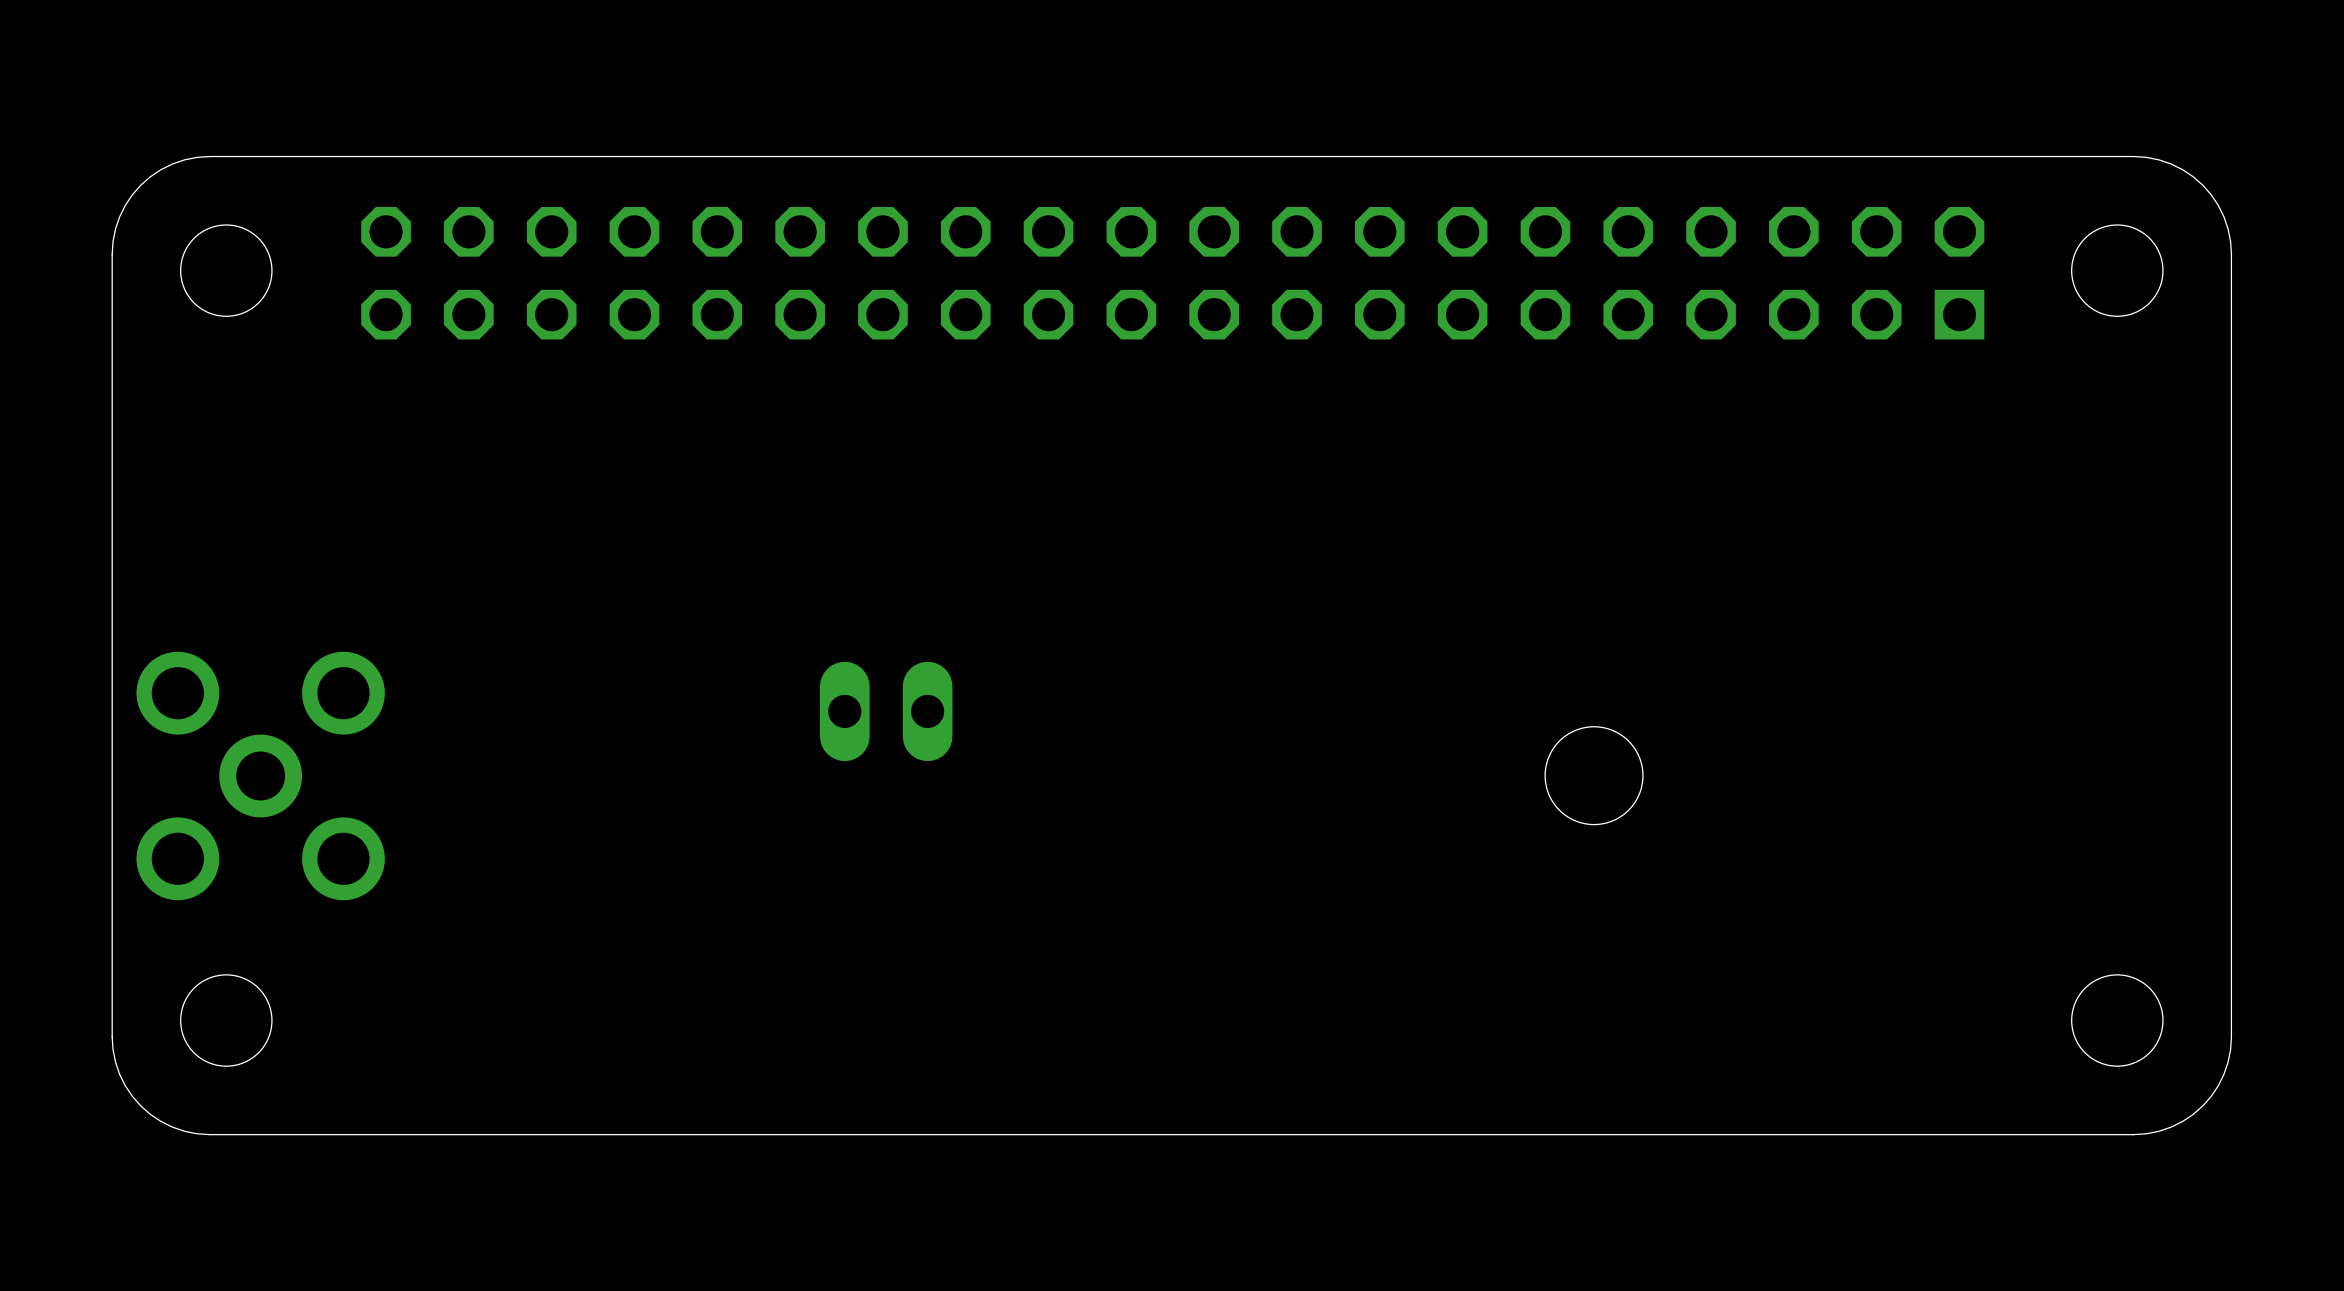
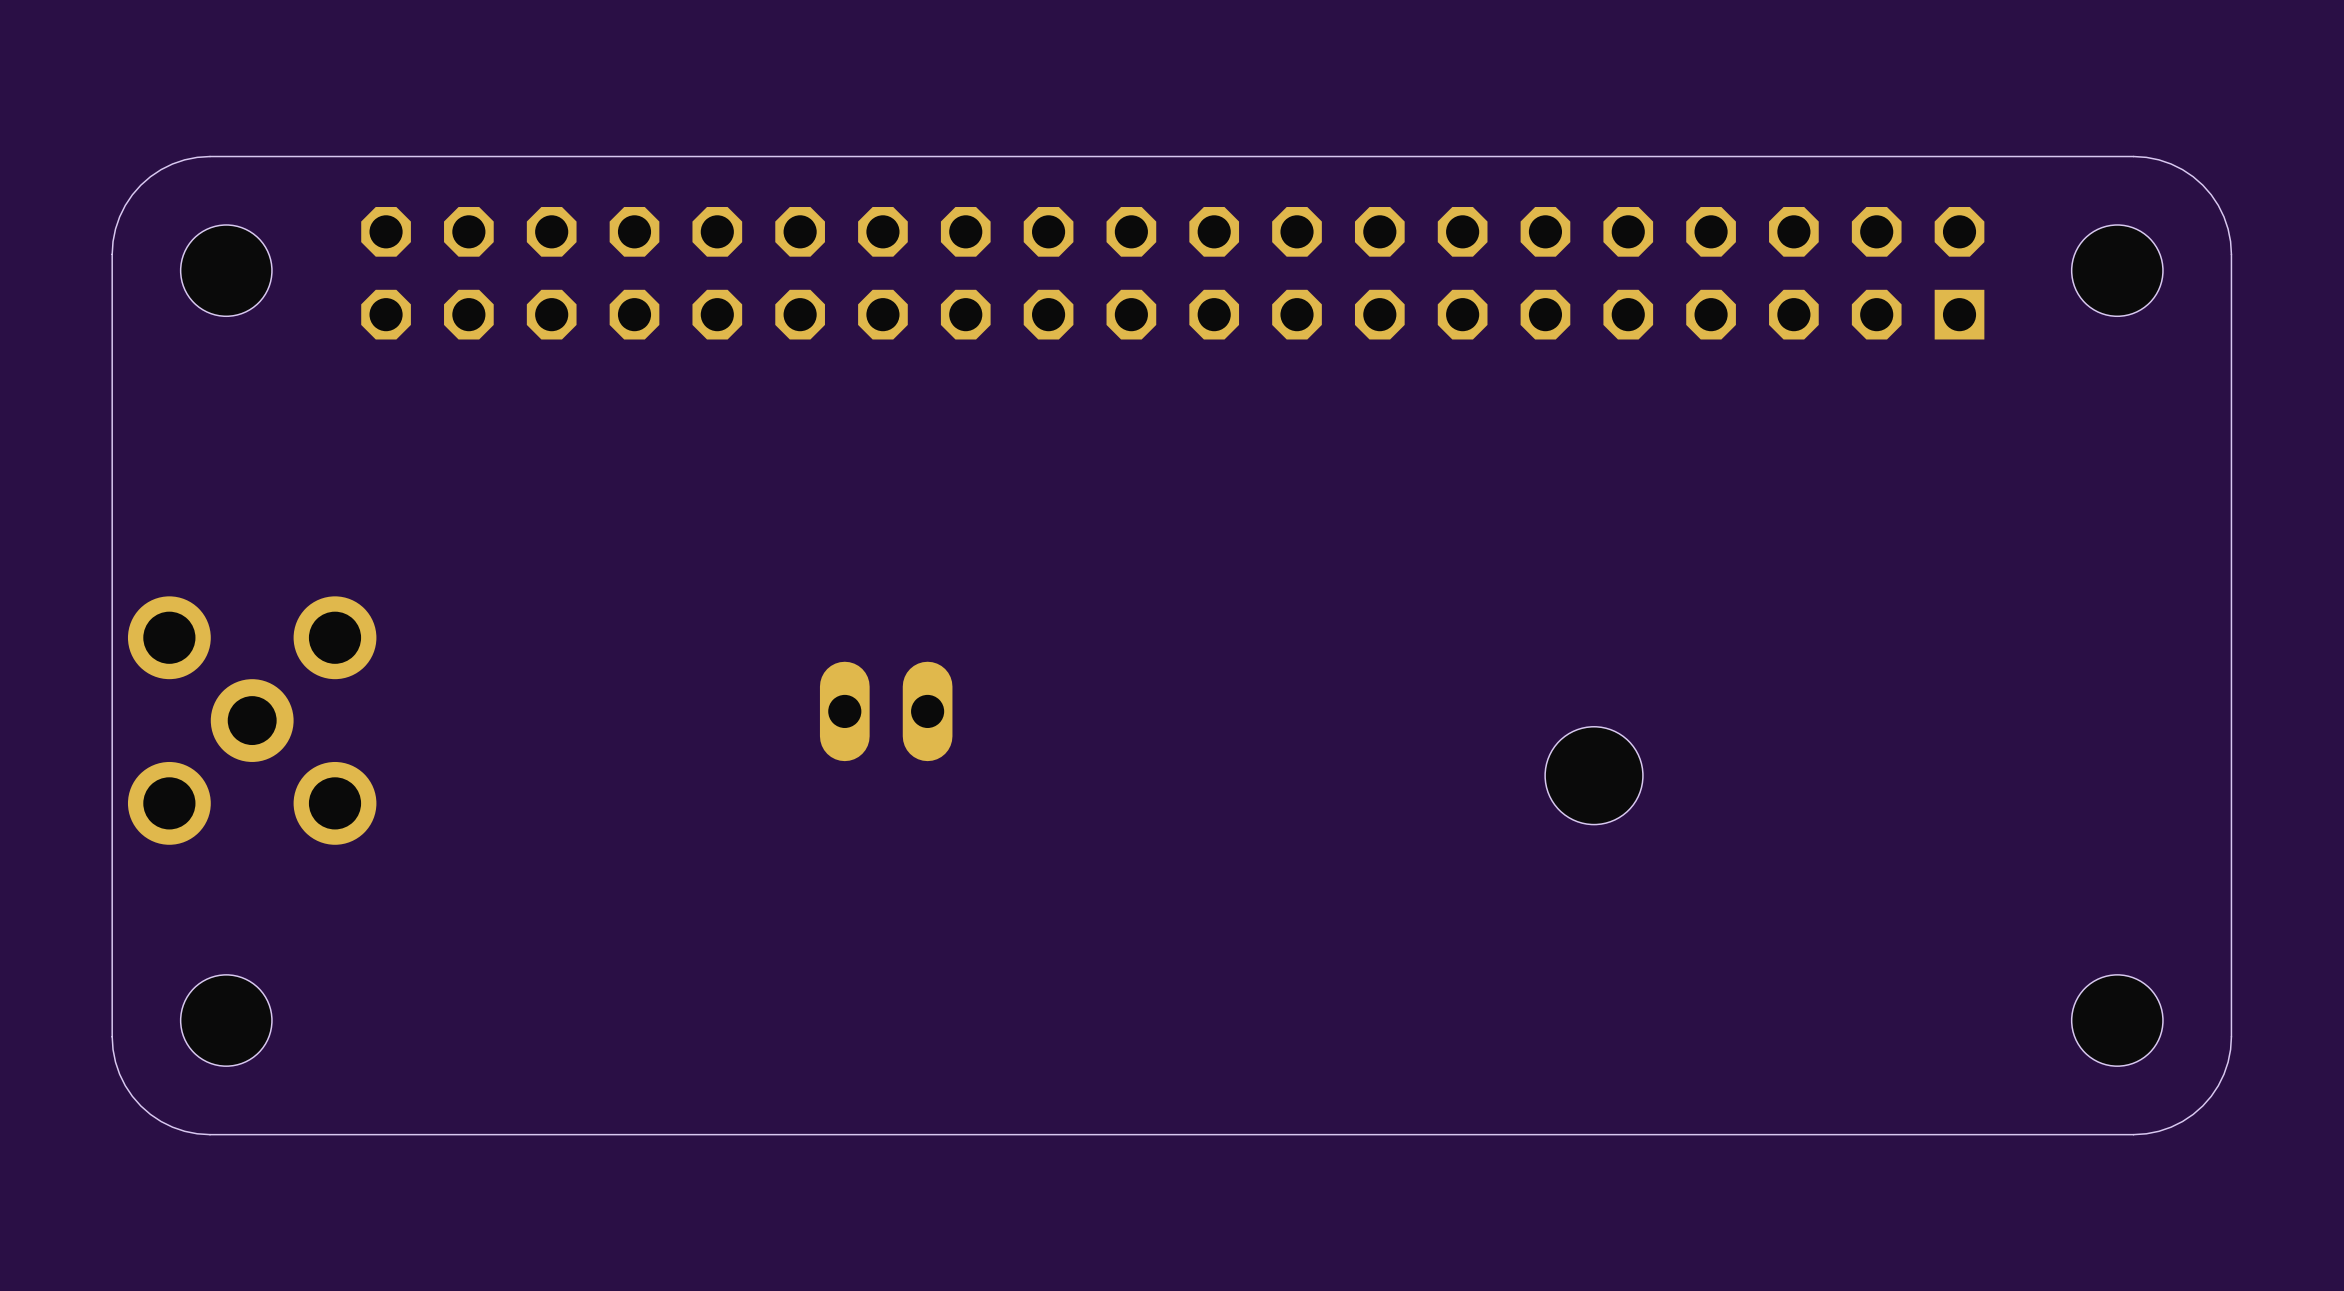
part position: (260, 775) -> (252, 720)

